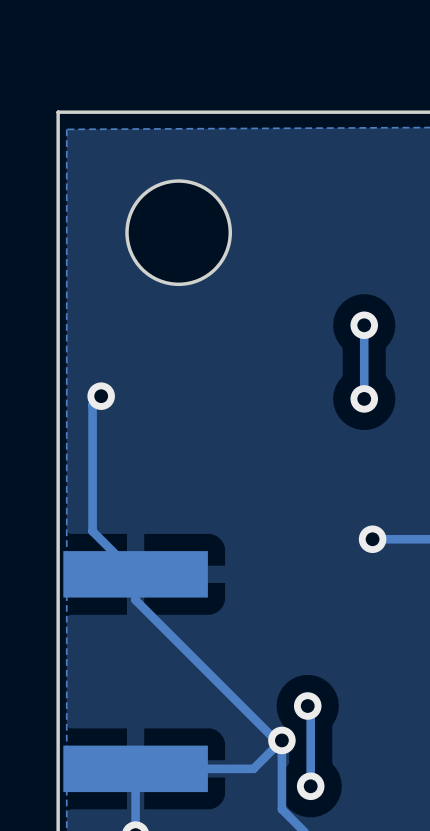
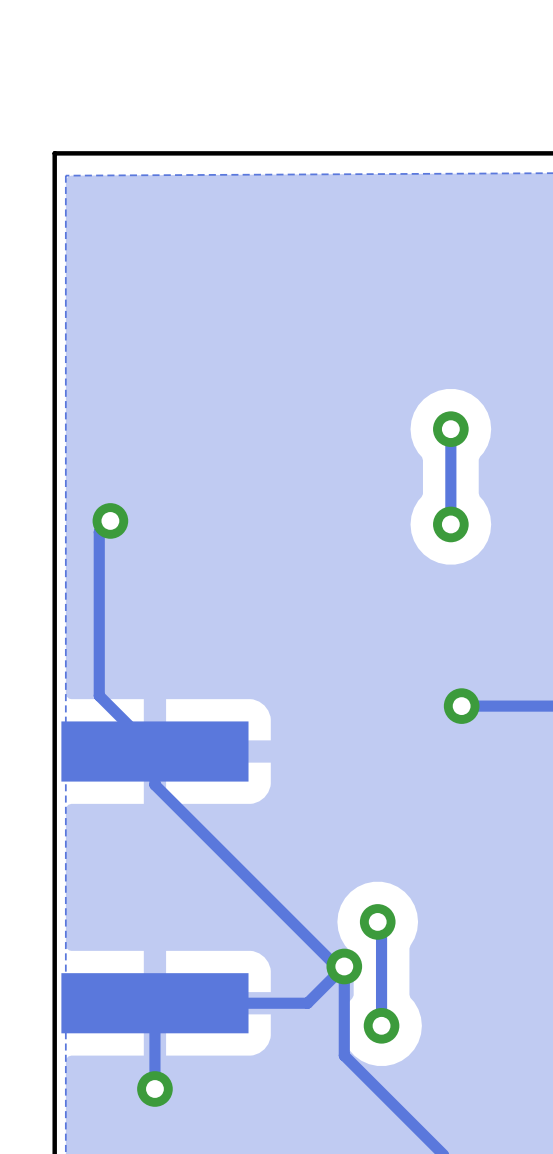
round board edge: [125, 179, 233, 287] -> none

